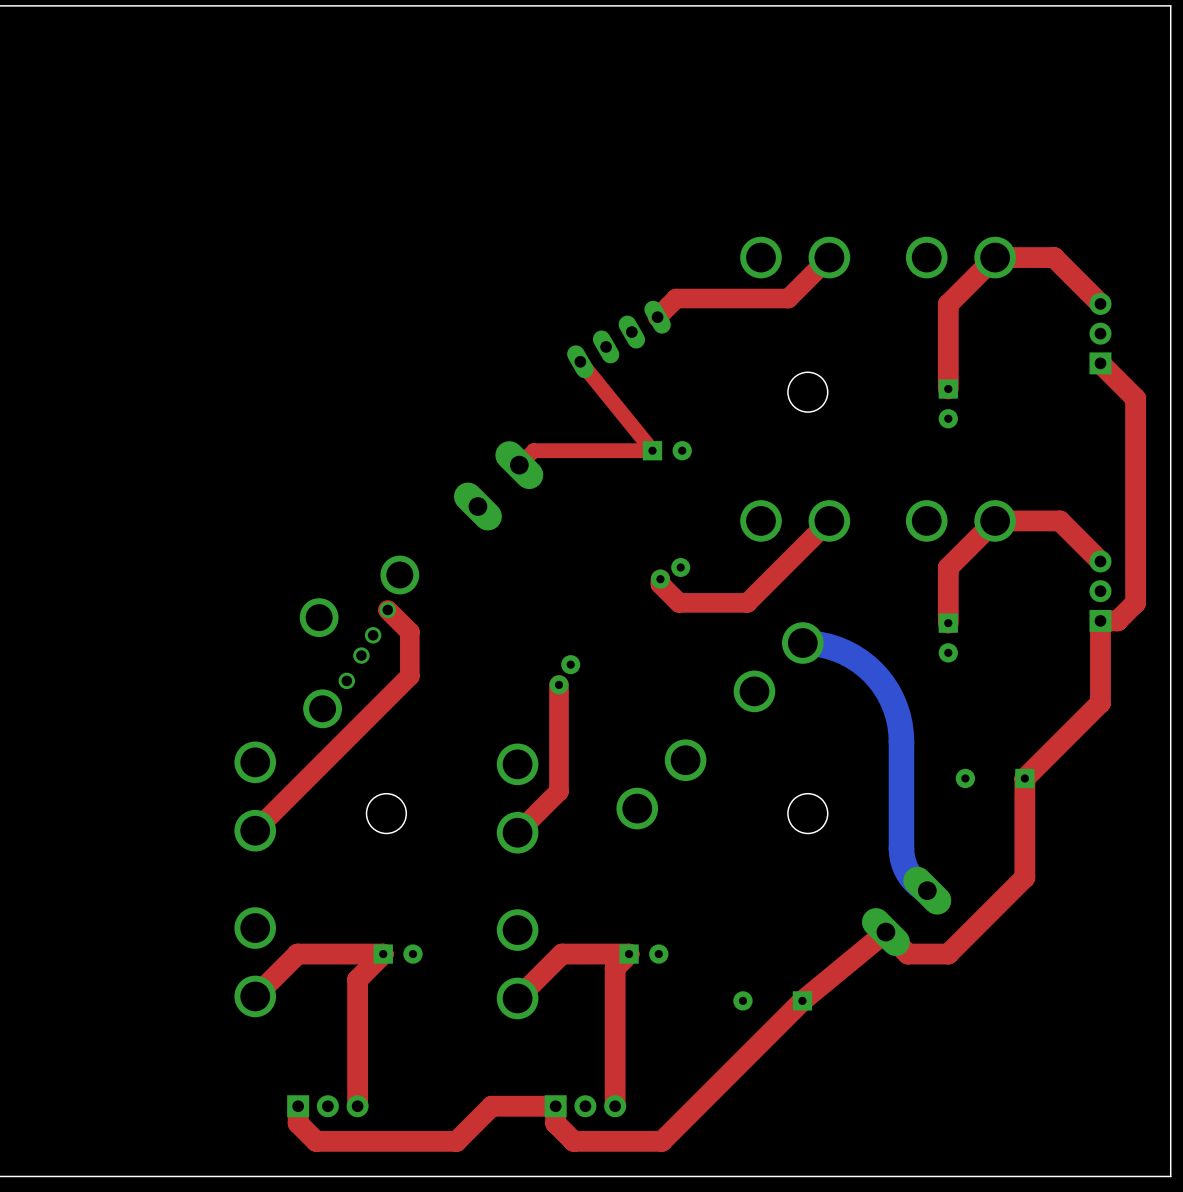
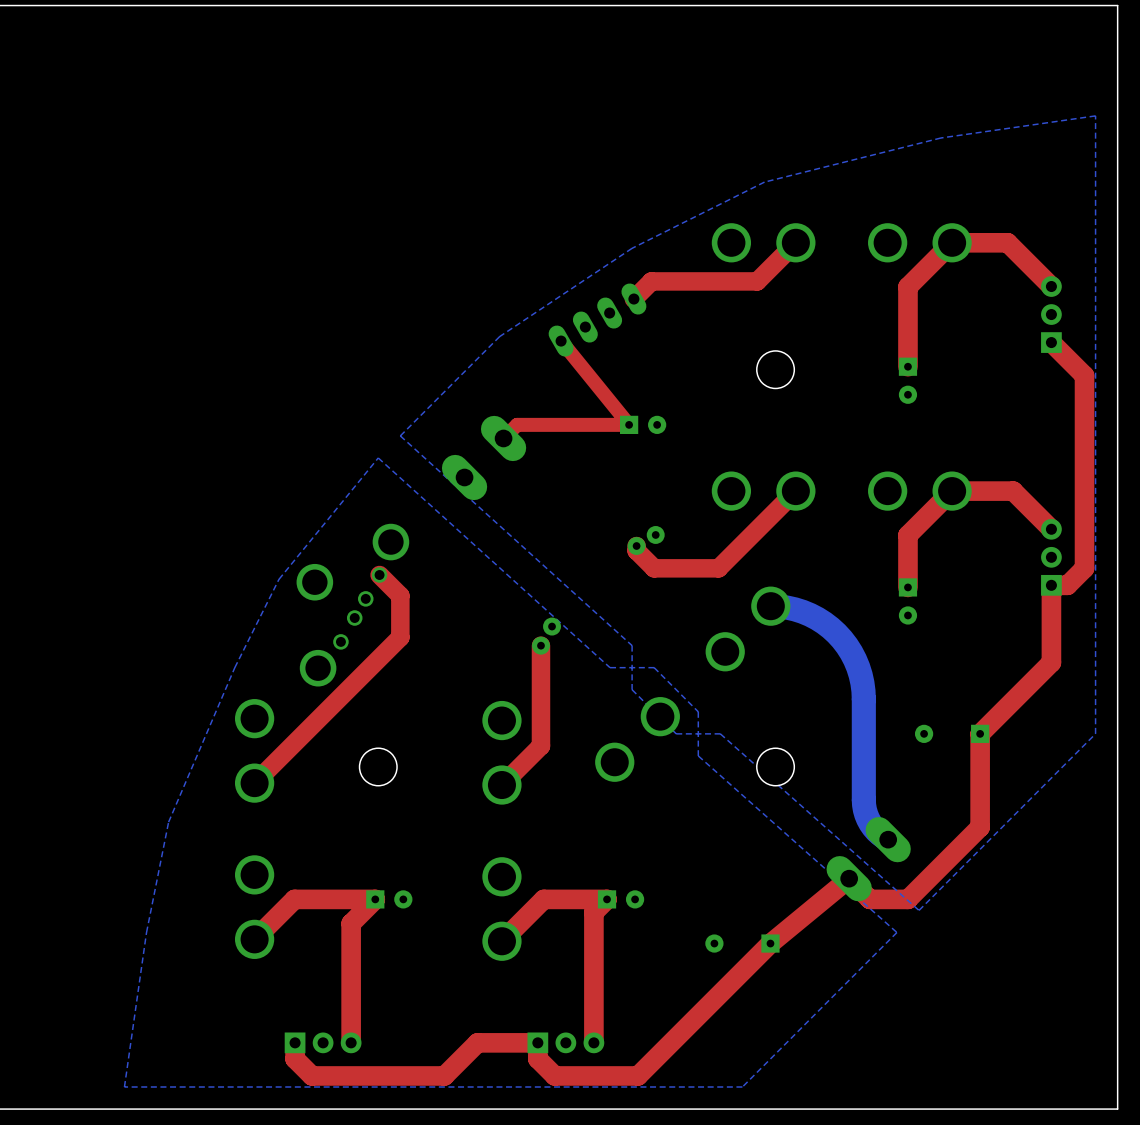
bottom zone outline: none -> (1095, 115) (941, 137) (764, 182) (632, 248) (499, 336) (400, 435) (632, 645) (632, 689) (676, 733) (720, 733) (919, 910) (1095, 733) (1095, 115)
bottom zone outline: none -> (378, 457) (278, 579) (234, 667) (168, 822) (146, 932) (124, 1087) (742, 1087) (896, 932) (698, 755) (698, 711) (654, 667) (610, 667) (378, 457)

